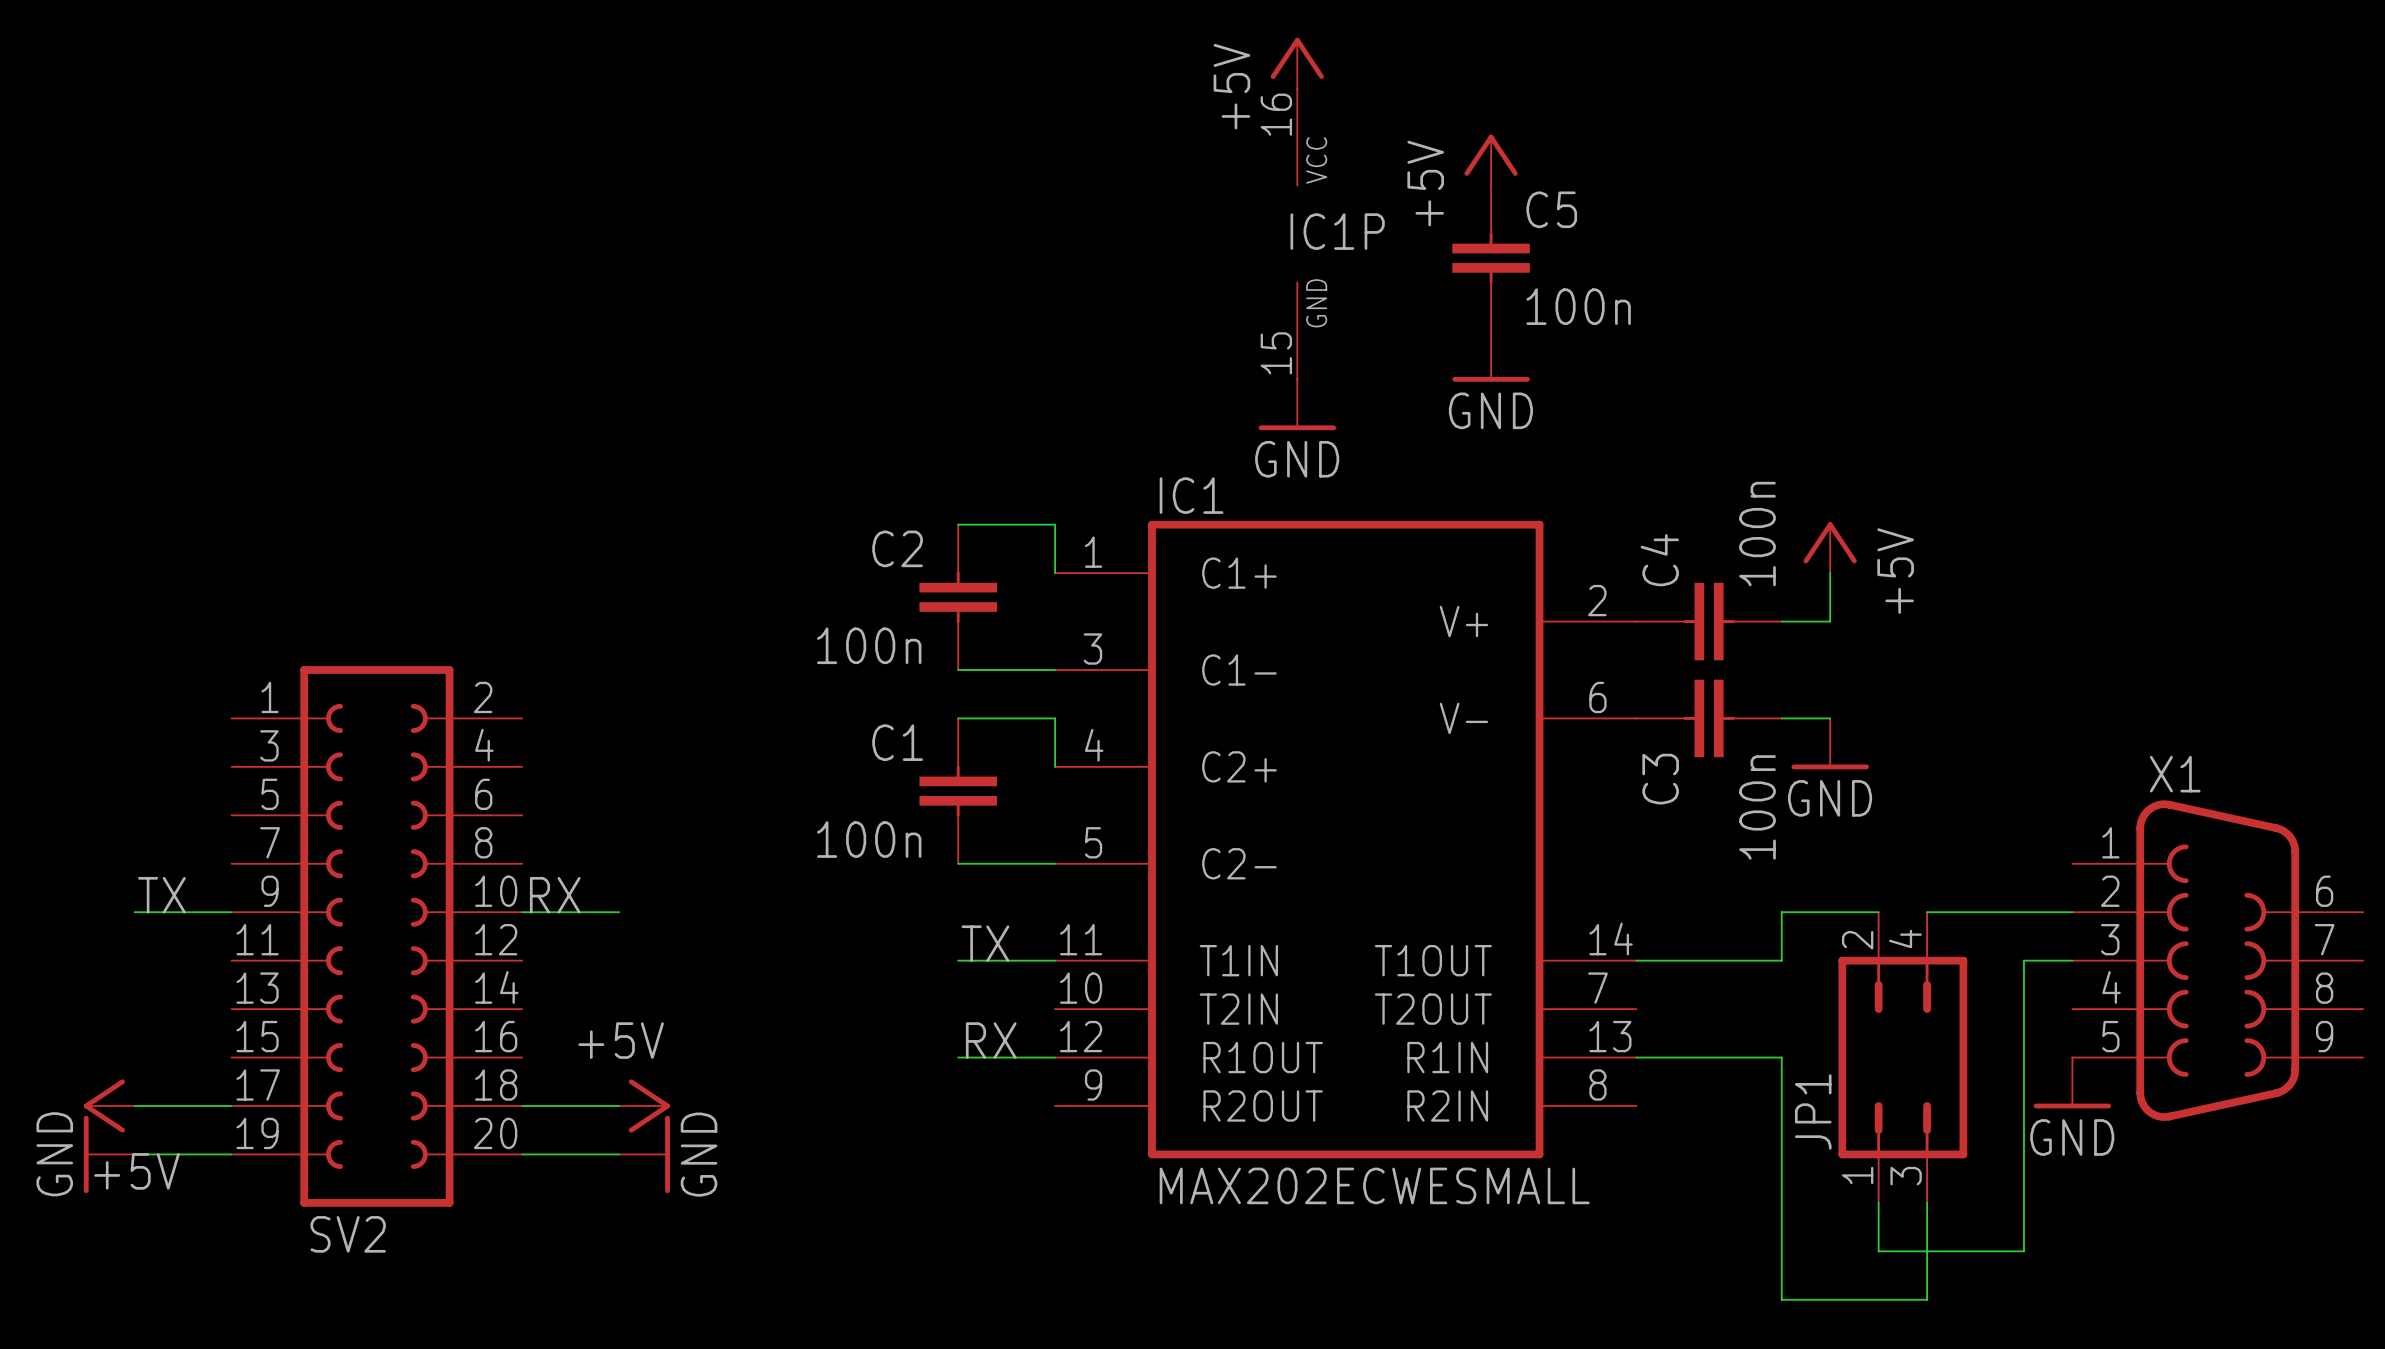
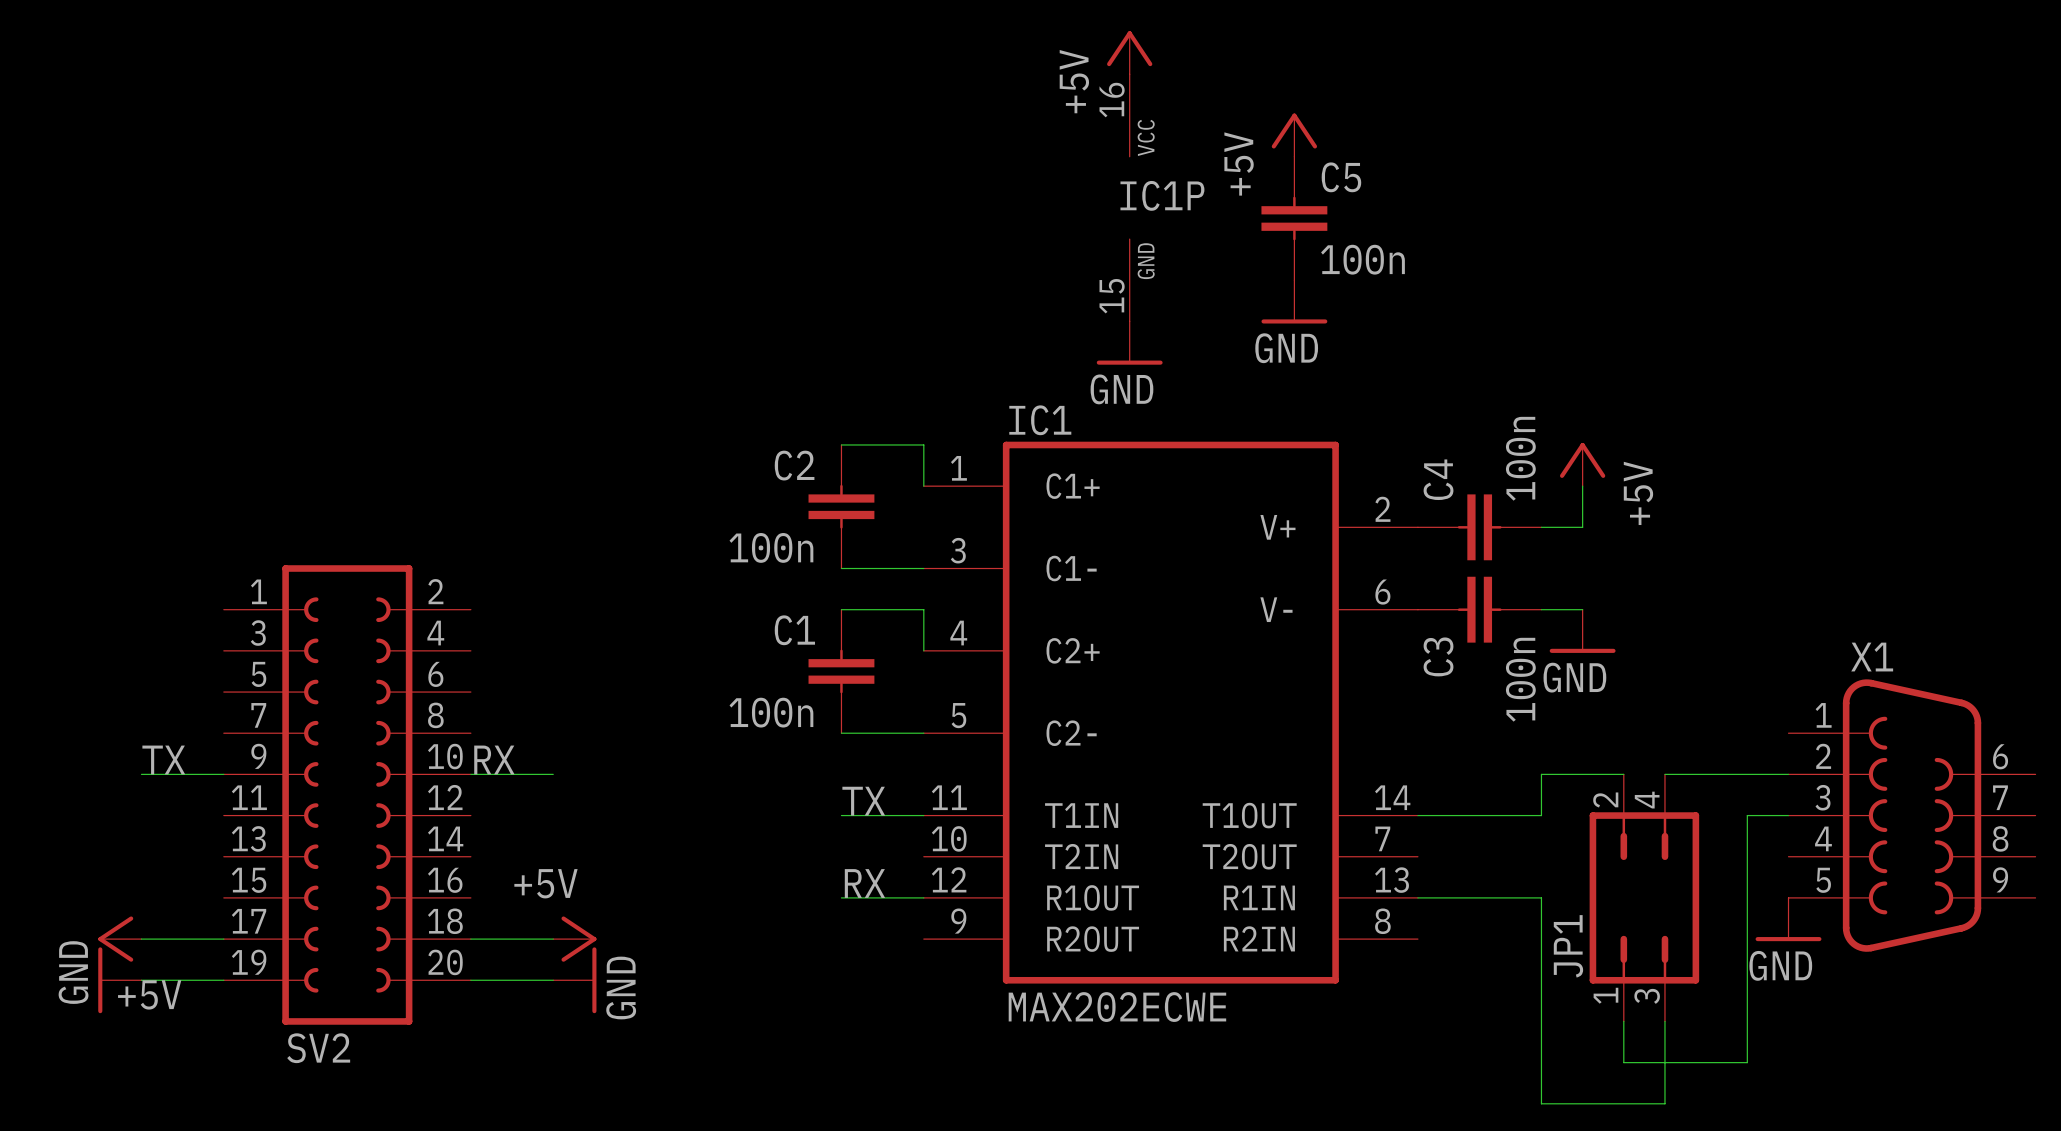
IC1 value: MAX202ECWESMALL (1374, 1185) -> MAX202ECWE (1117, 1007)

